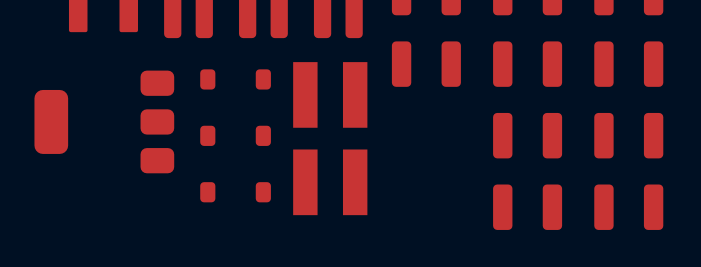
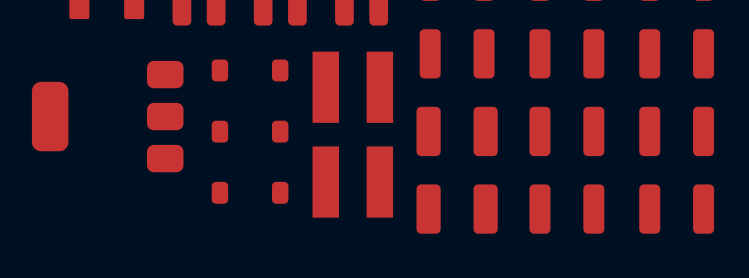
part: none -> (457, 131)
part: none -> (457, 209)

